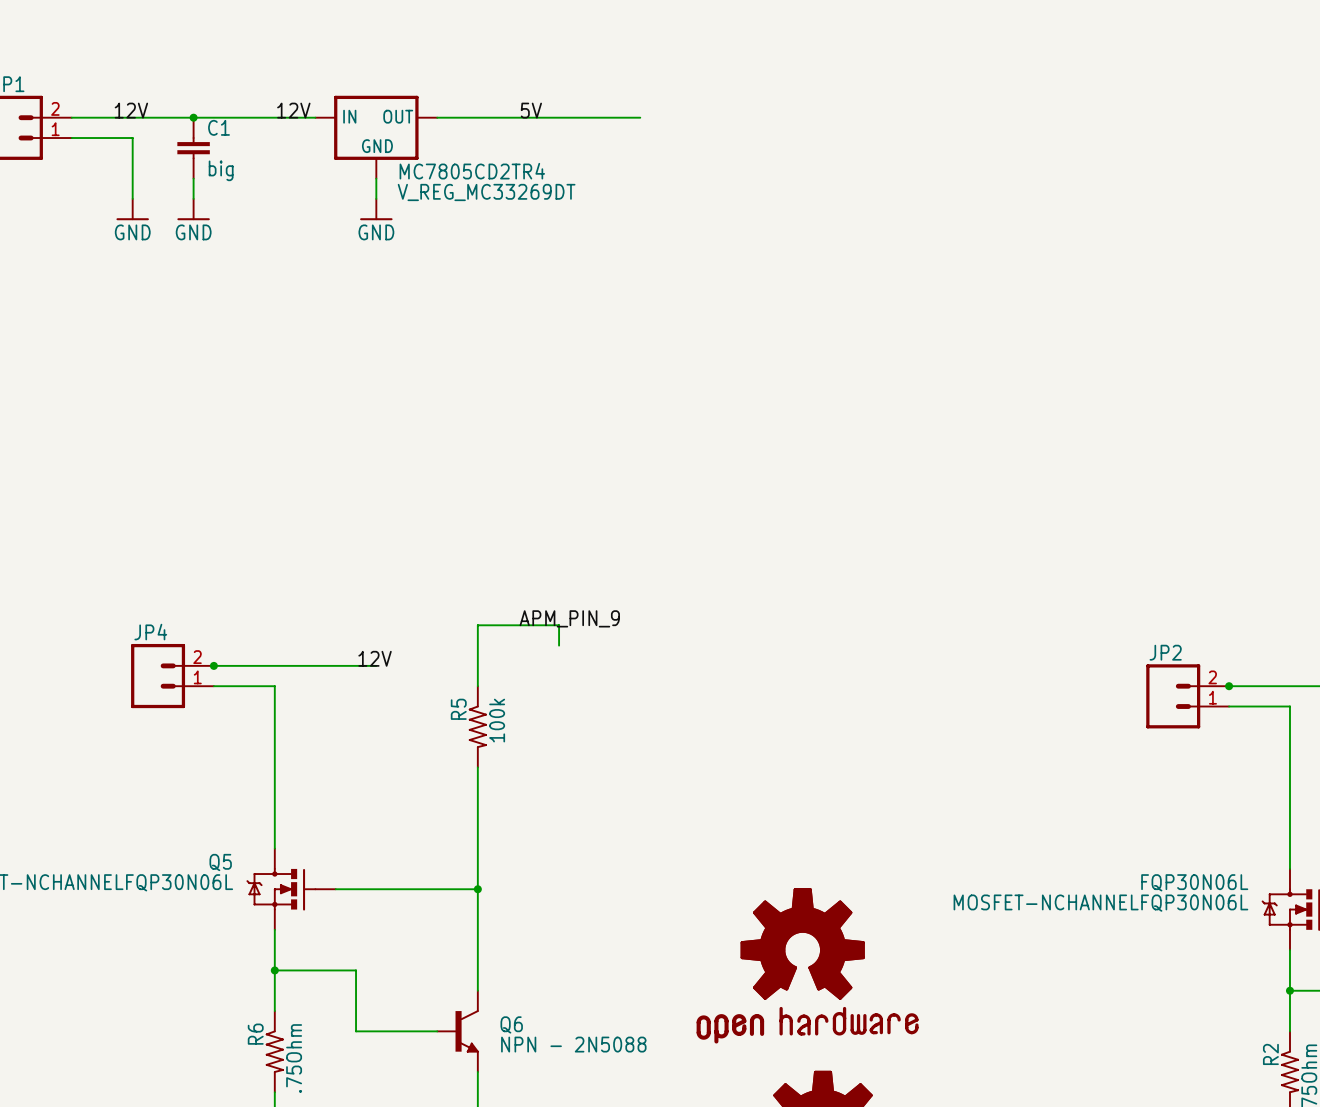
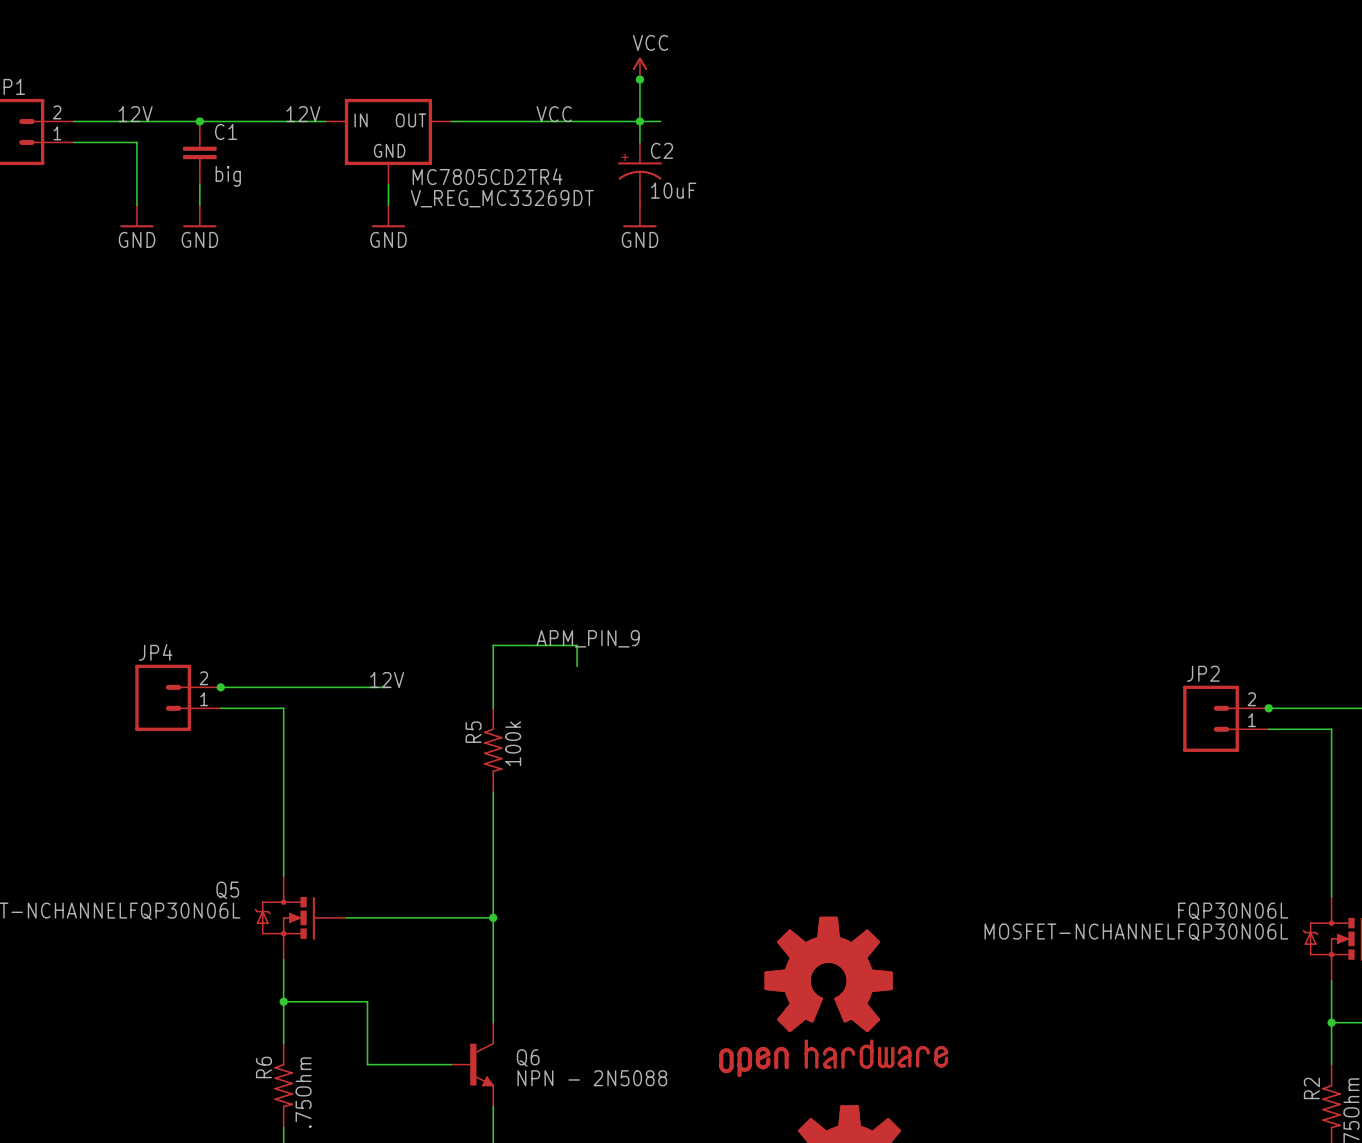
power symbol: none -> VCC (639, 68)
wire: none -> (639, 79) (639, 142)
junction: none -> (639, 79)
label: 5V (531, 110) -> VCC (554, 114)
junction: none -> (639, 121)
C2: none -> 10uF (639, 173)
power symbol: none -> GND (639, 216)

